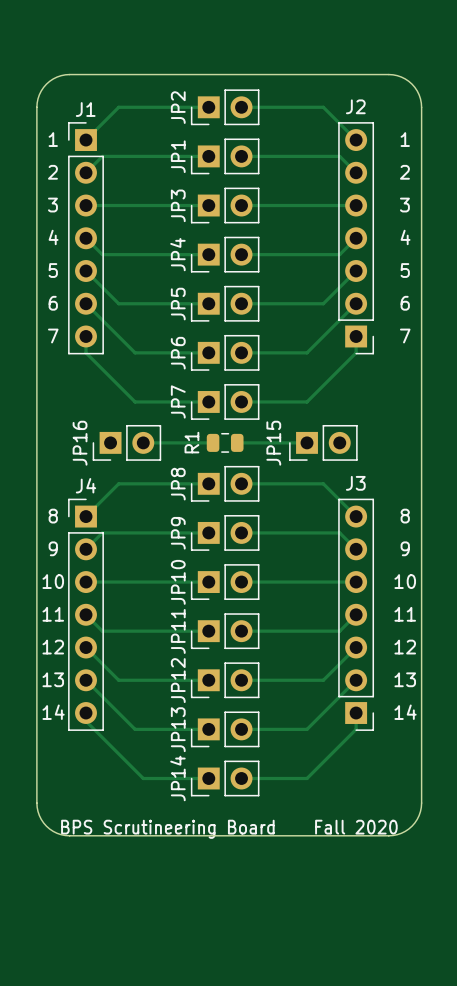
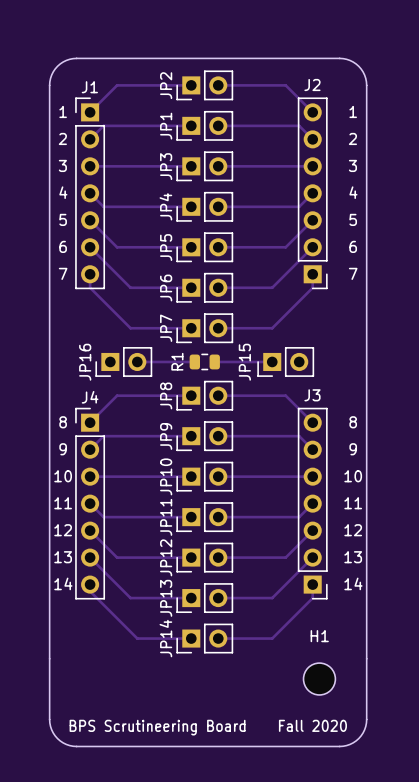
board edge: (36, 803) (39, 815) (46, 826) (57, 833) (69, 835) (393, 835) (405, 831) (412, 826) (419, 815) (421, 803) -> (49, 658) (50, 726) (60, 740) (76, 746) (346, 745) (358, 738) (365, 726) (366, 658)
text position: Fall 2020 (356, 827) -> Fall 2020 (312, 725)
H1: none -> (319, 679)
text position: BPS Scrutineering Board (167, 829) -> BPS Scrutineering Board (157, 727)

